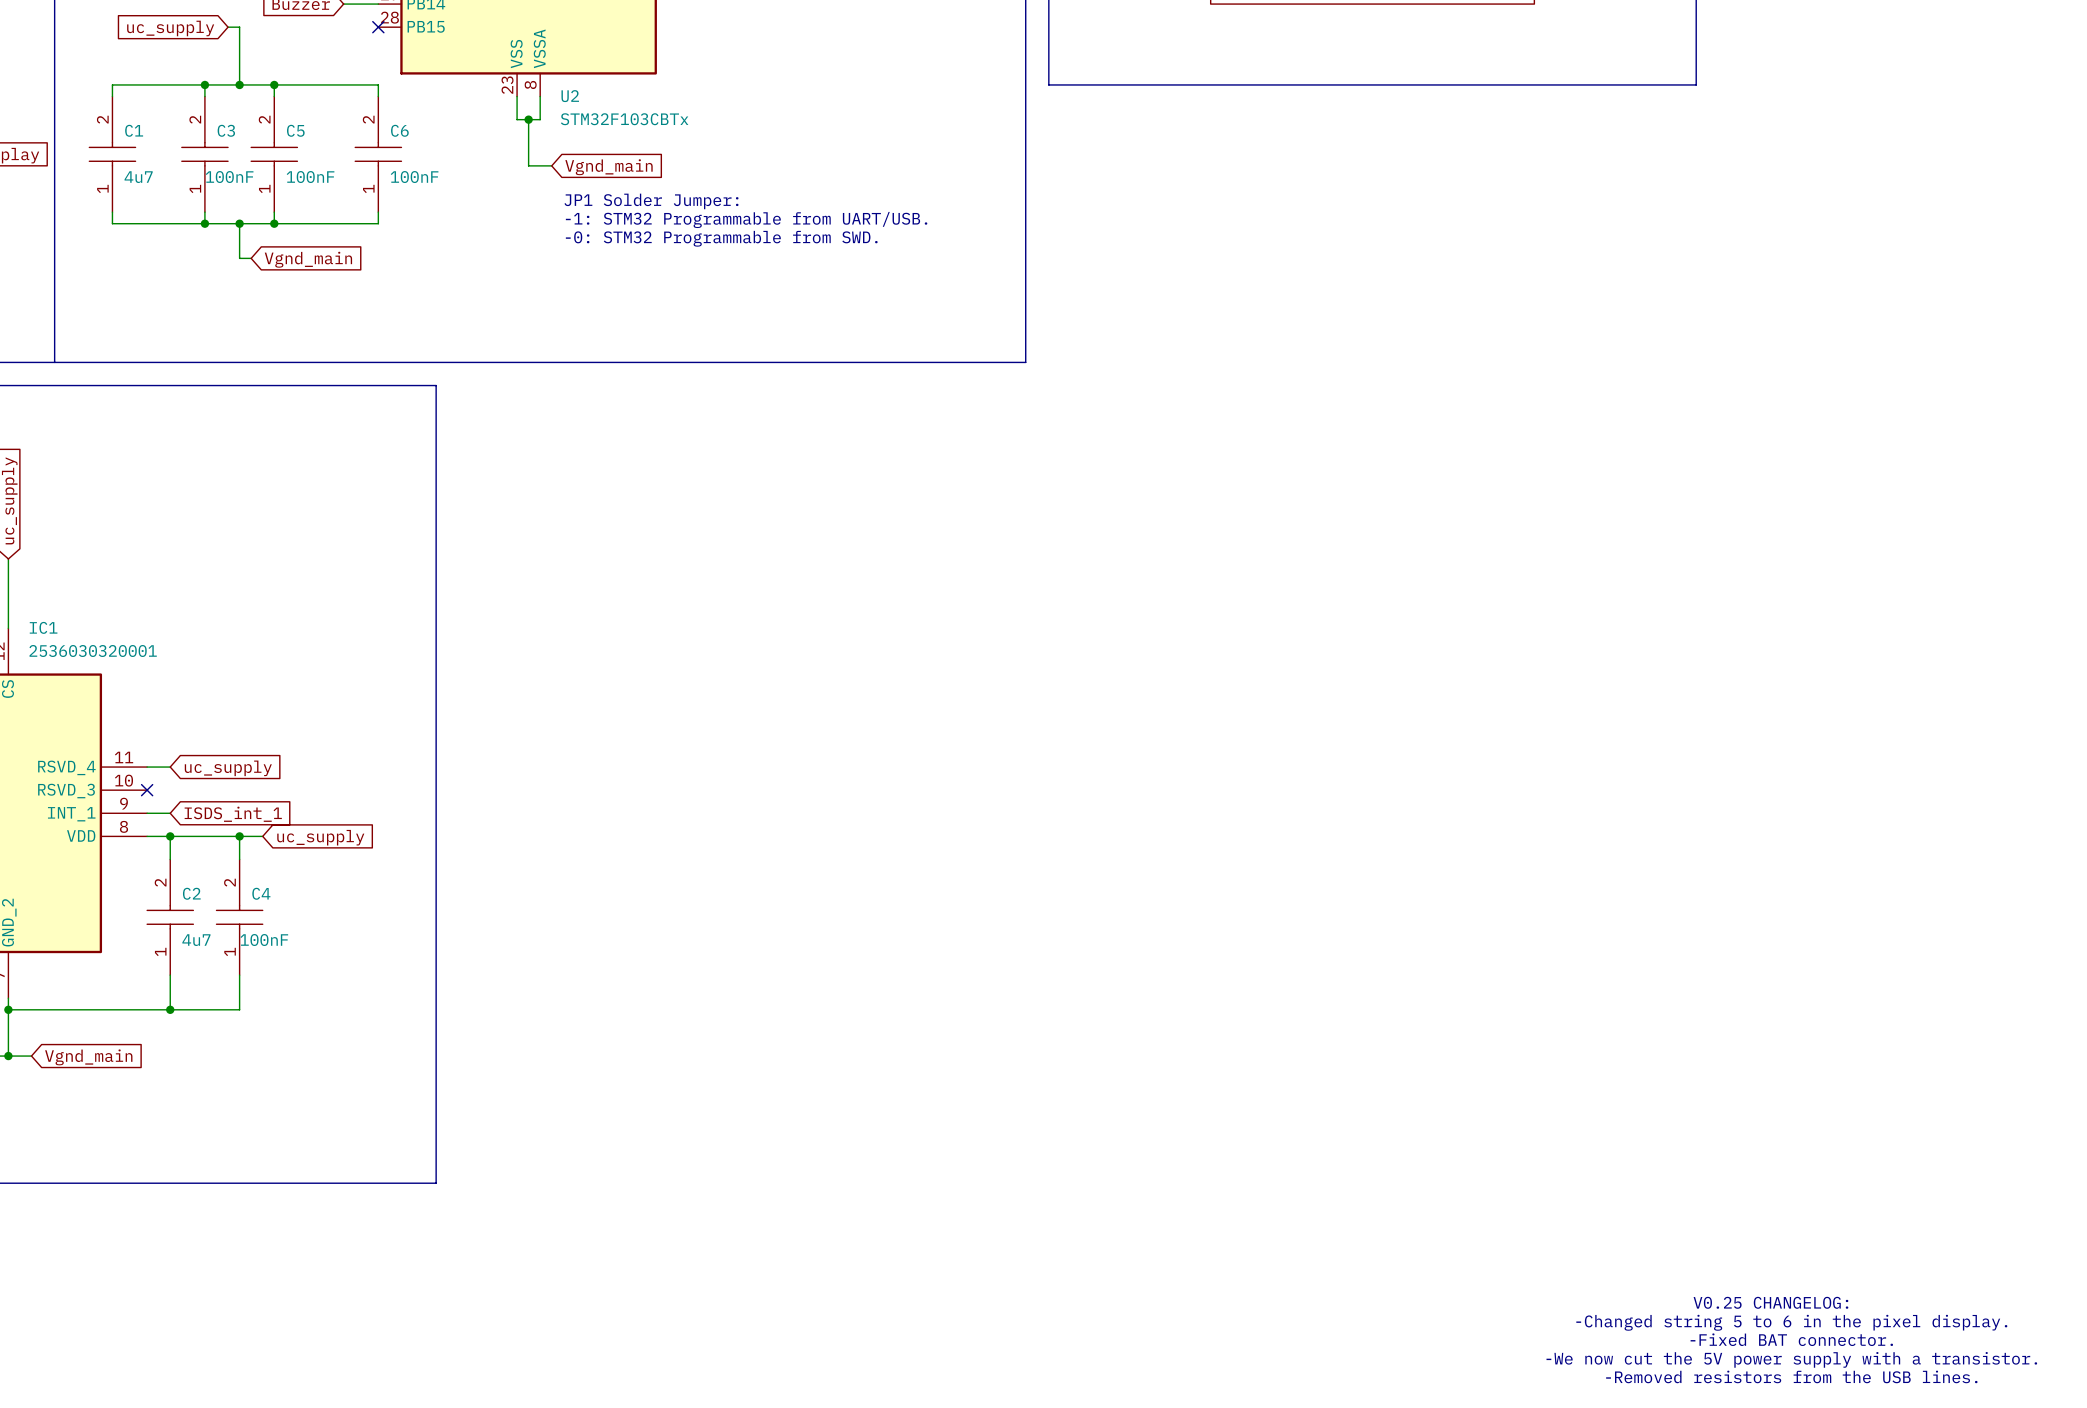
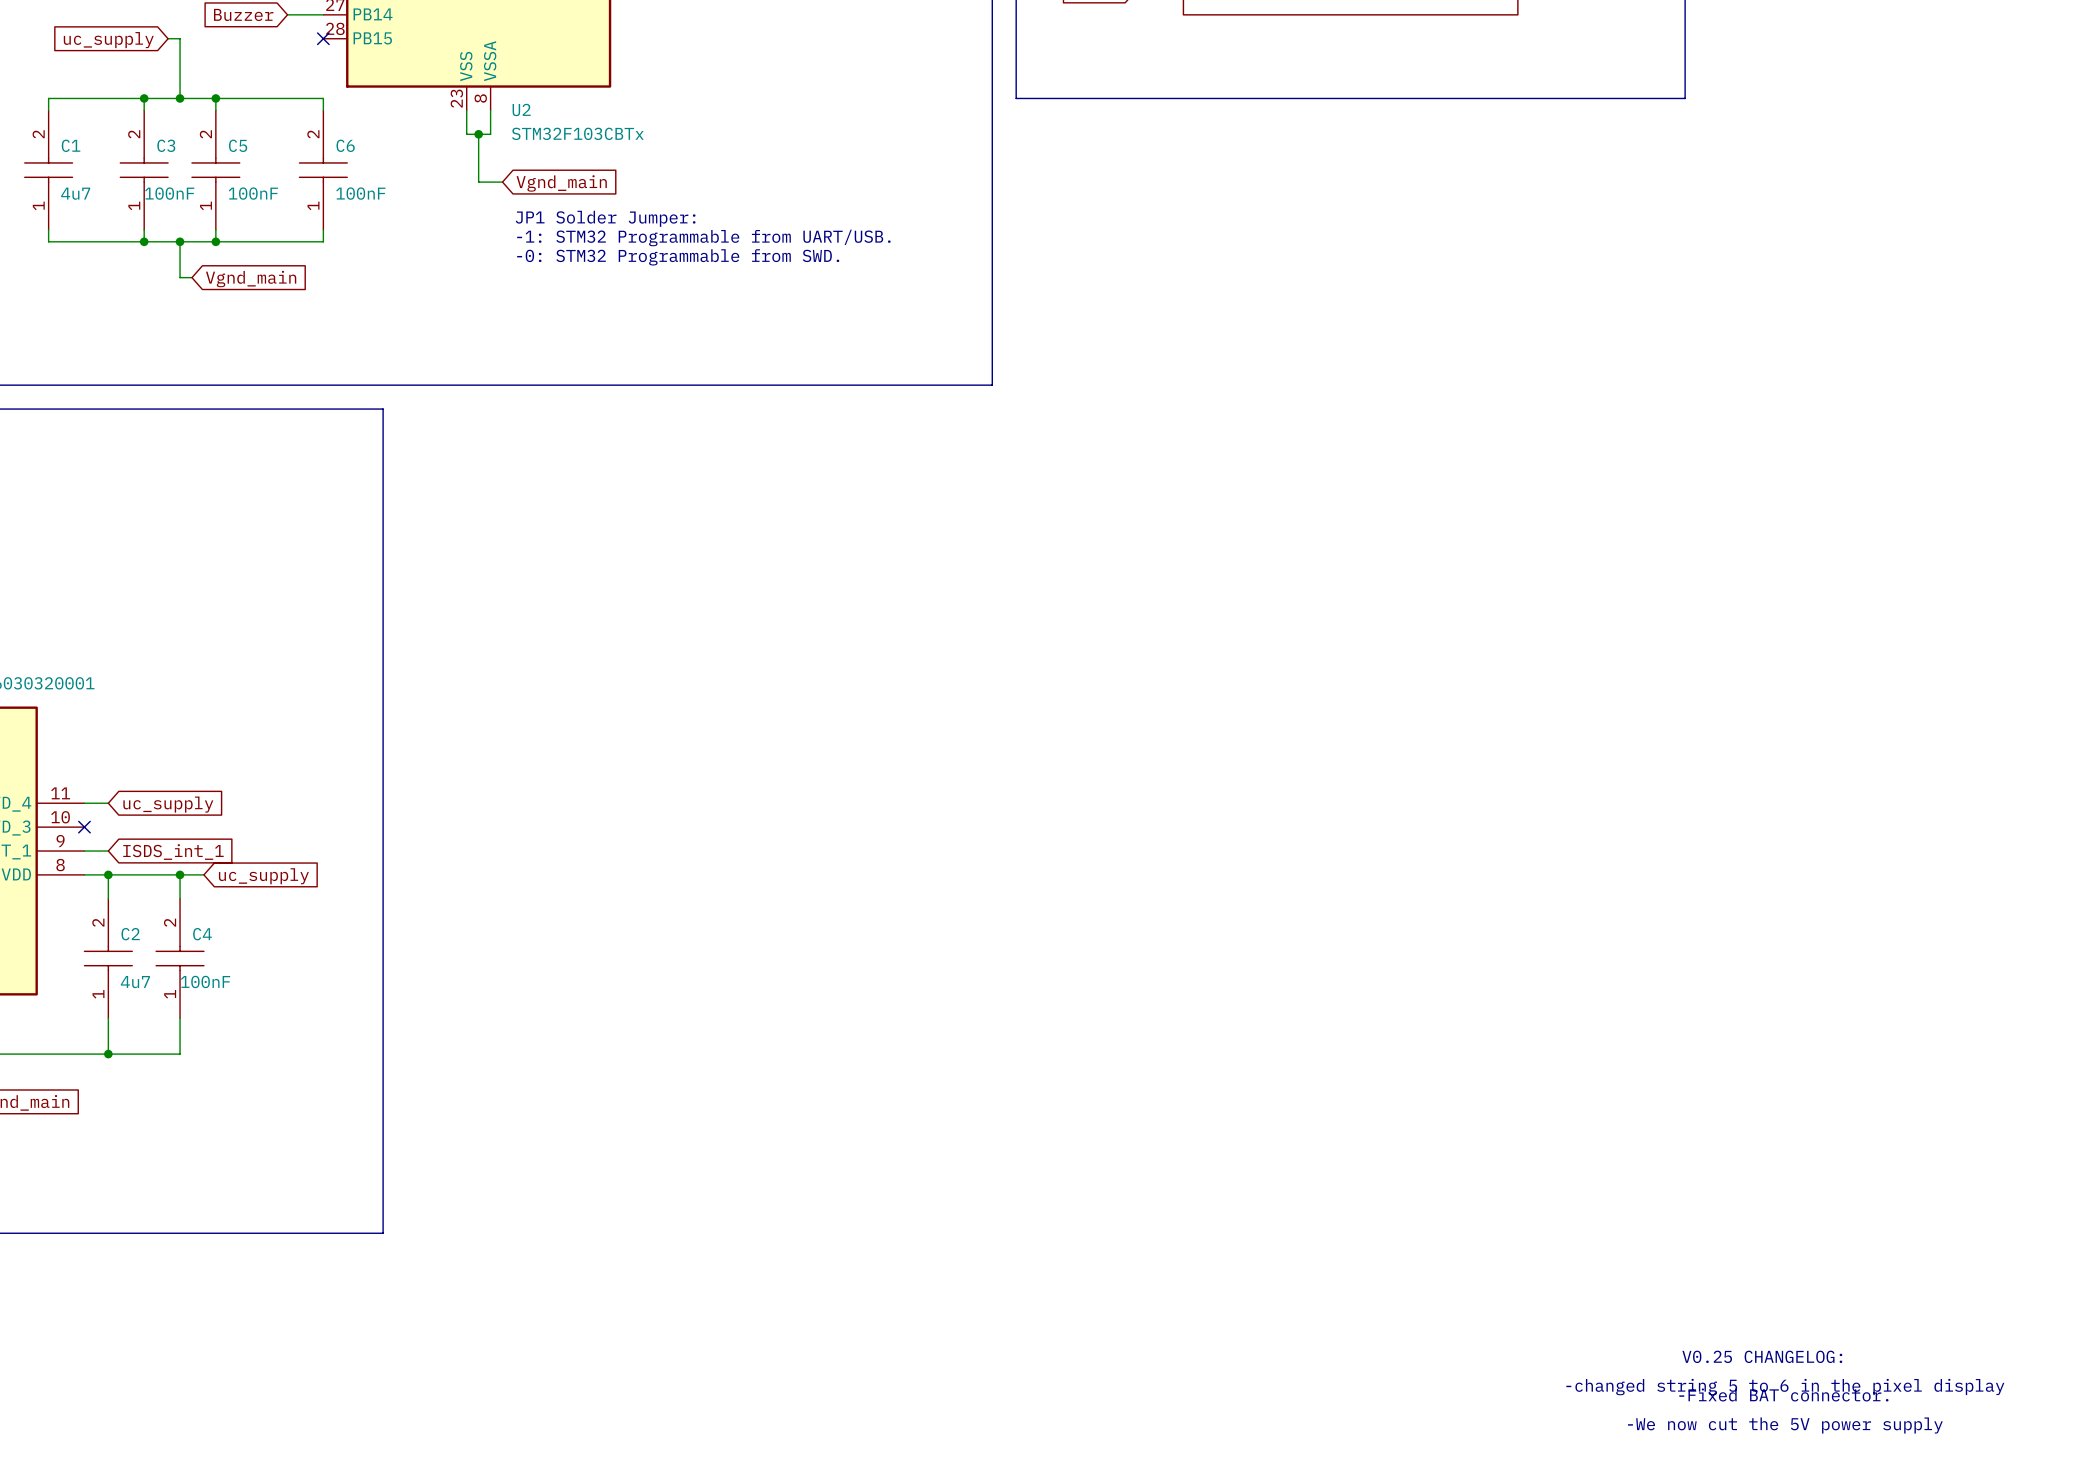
text: -Changed string 5 to 6 in the pixel display. (1791, 1322) -> -changed string 5 to 6 in the pixel display (1785, 1387)
text: -We now cut the 5V power supply with a transistor. (1791, 1359) -> -We now cut the 5V power supply (1785, 1425)
text: -Removed resistors from the USB lines. (1791, 1376) -> none

